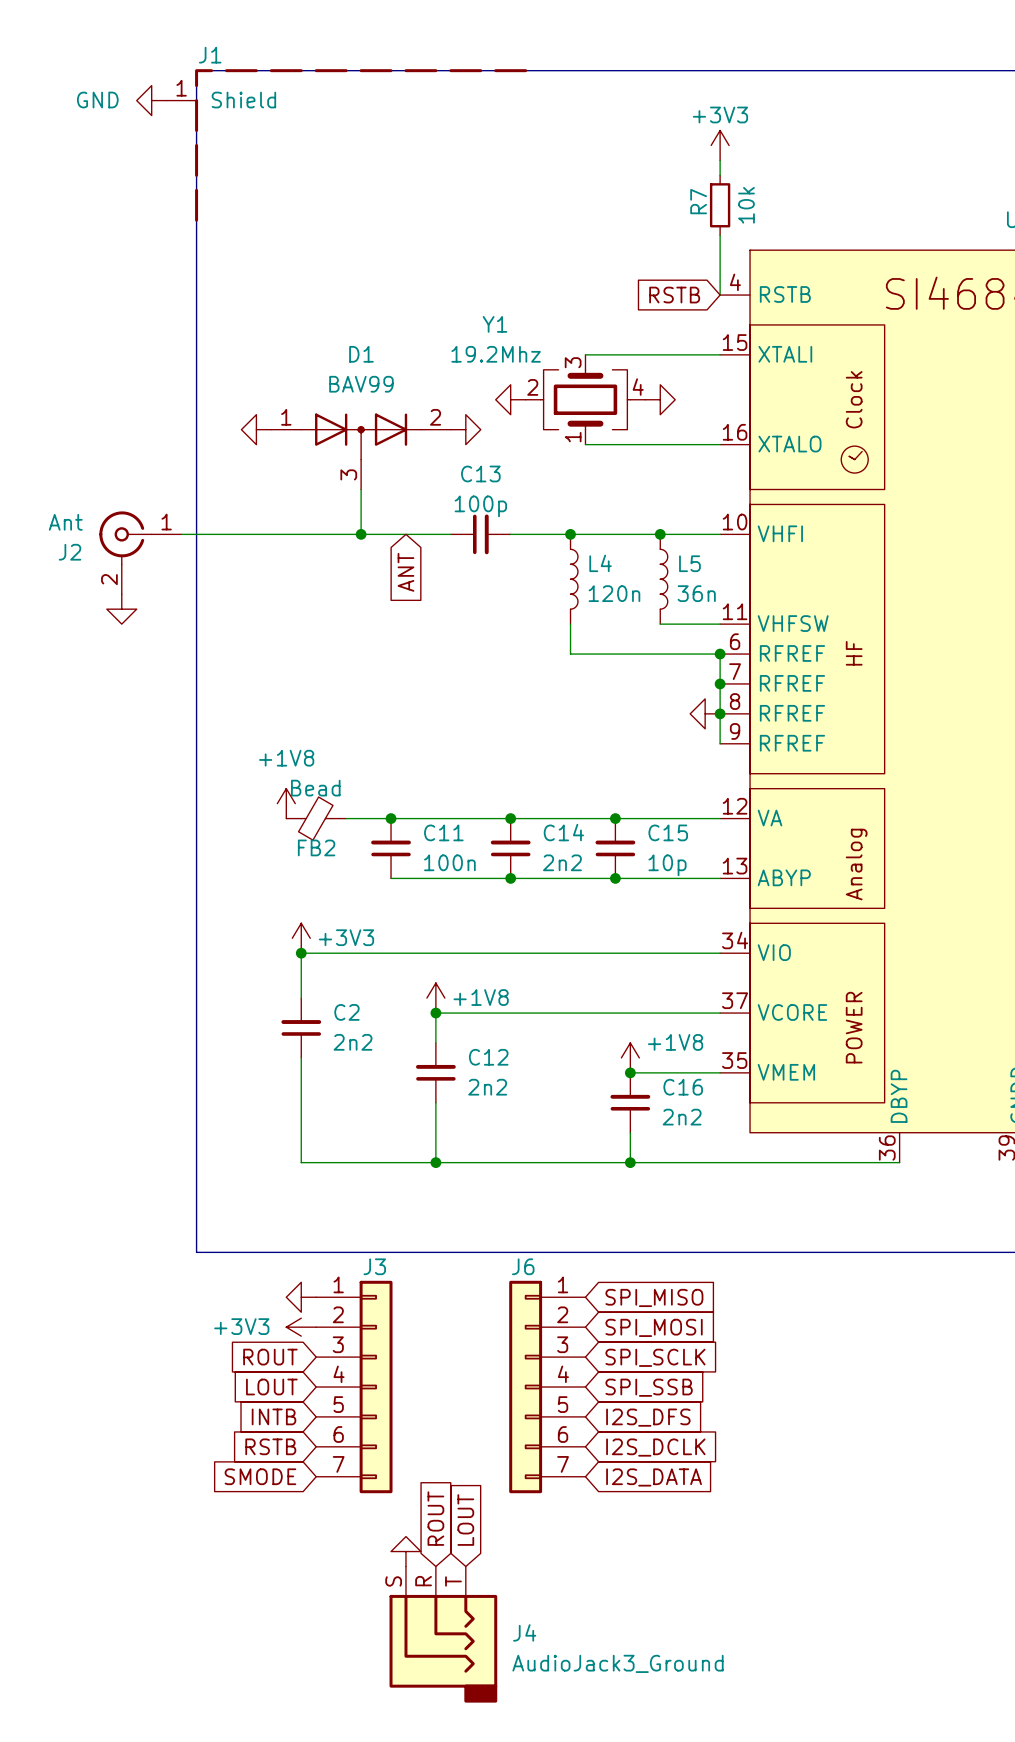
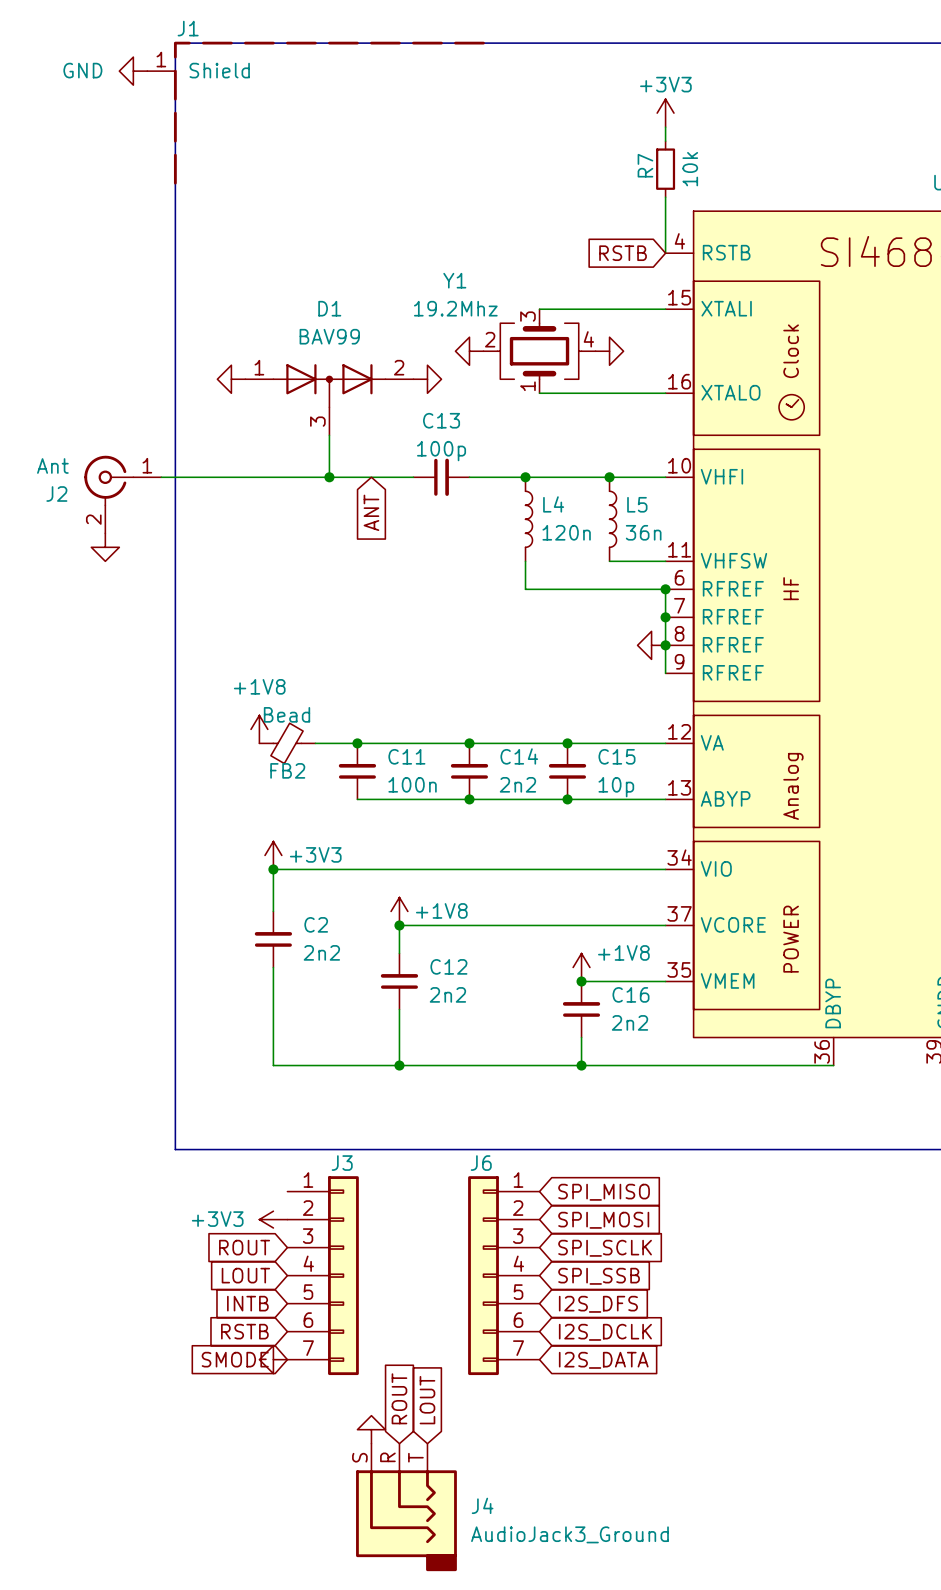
power symbol position: (301, 1297) -> (273, 1359)

